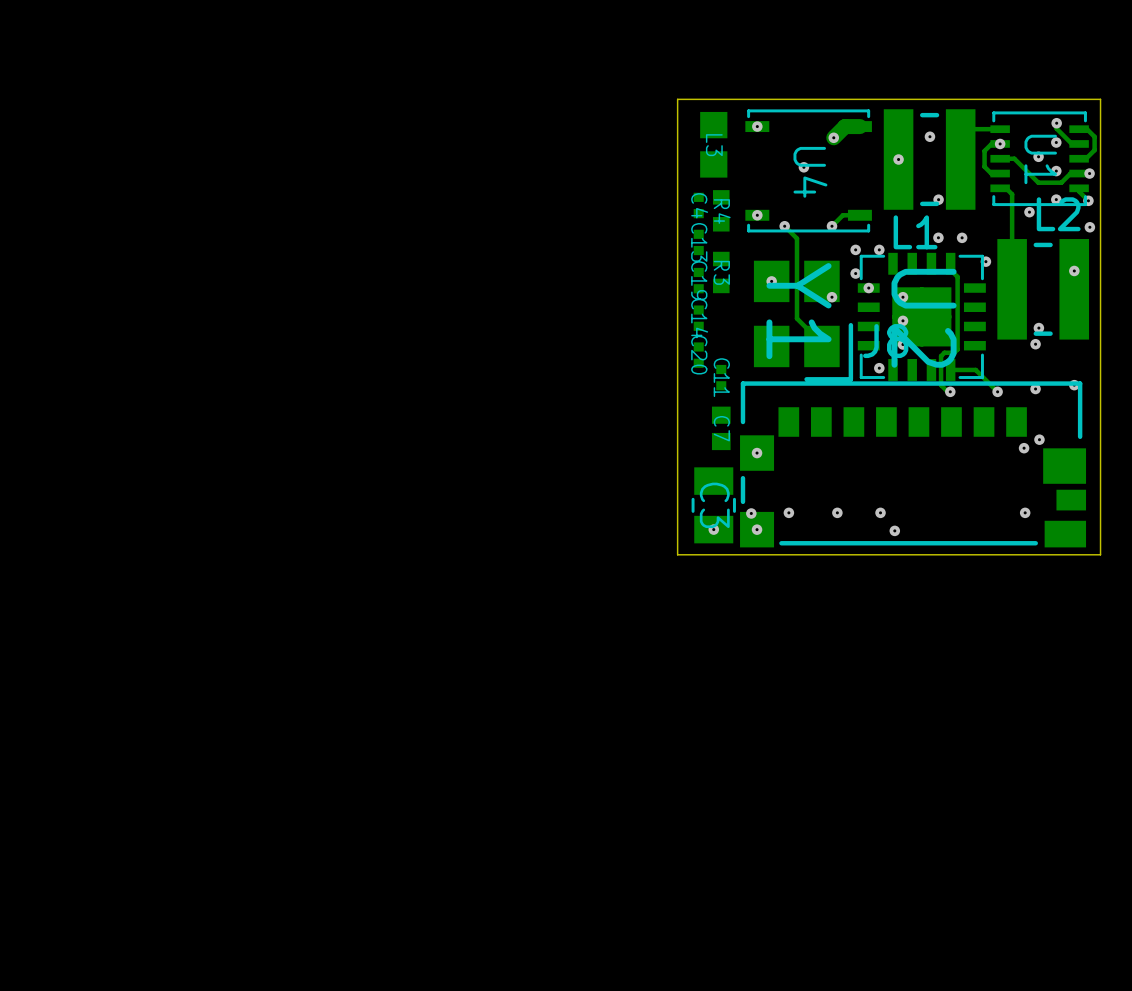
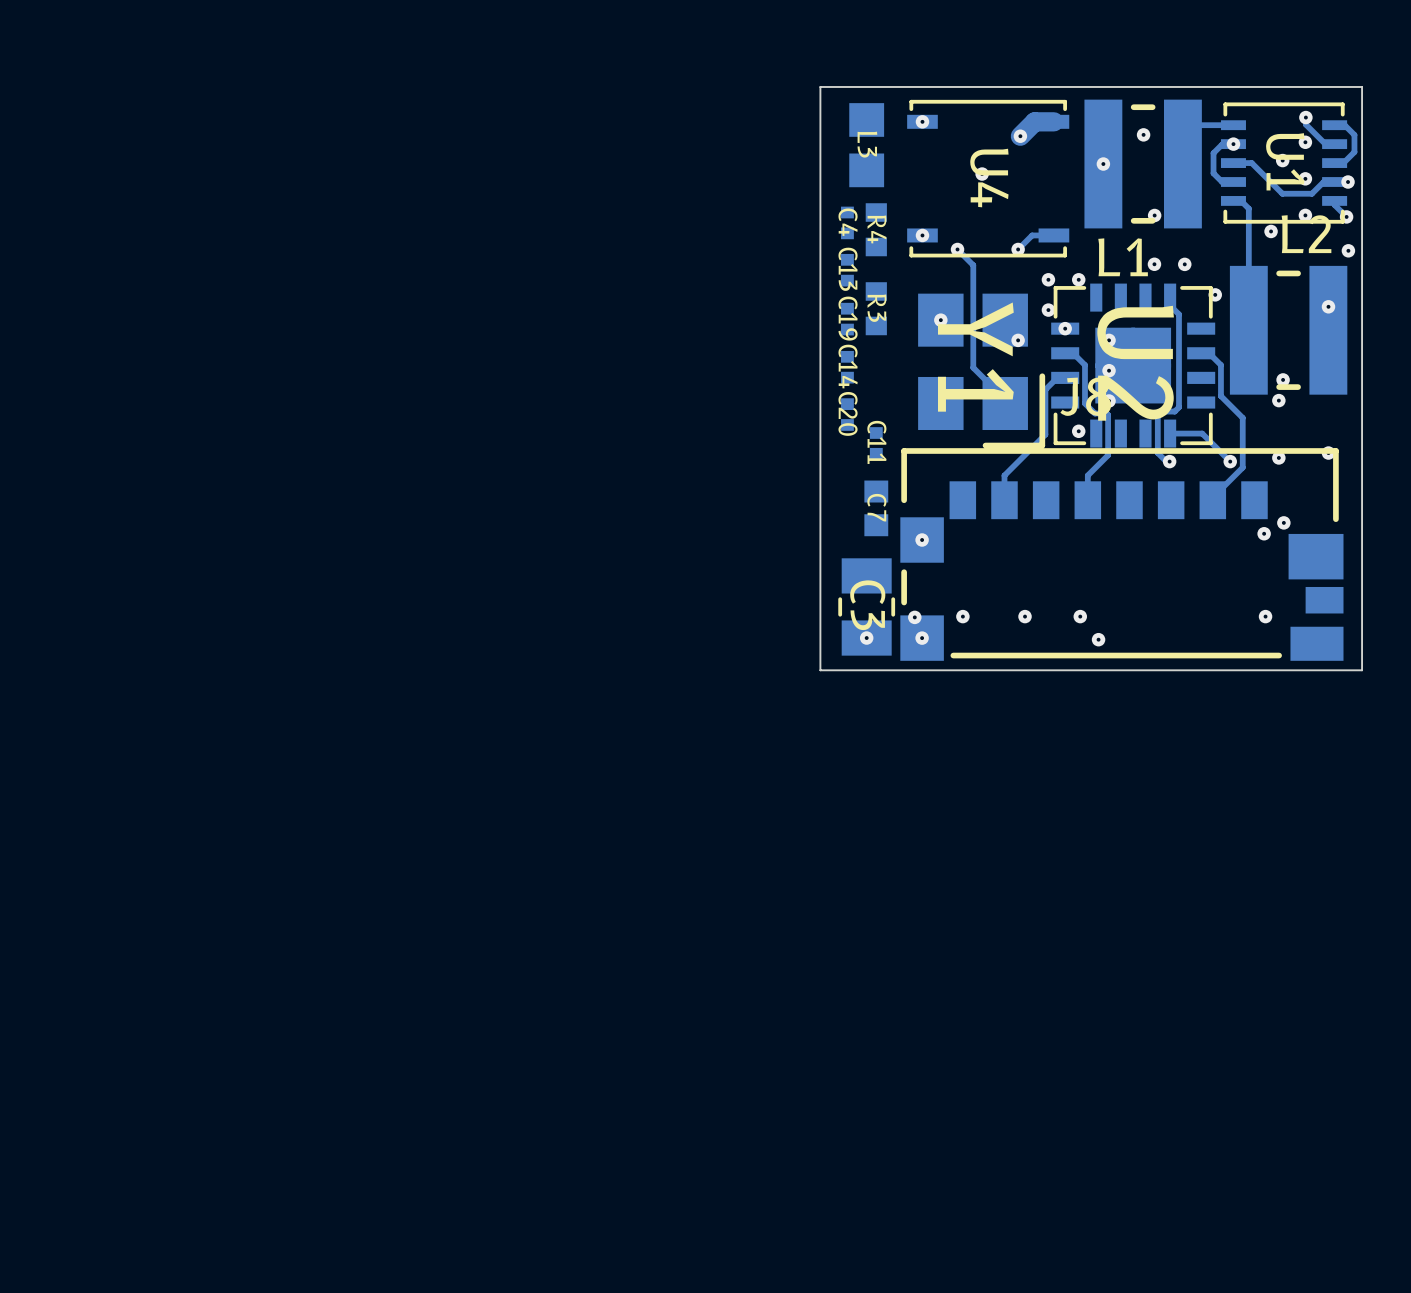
track: none -> (1065, 353) (1073, 353) (1084, 365) (1084, 403) (1094, 413) (1108, 414) (1108, 455) (1087, 475) (1087, 500)
track: none -> (1201, 353) (1209, 353) (1220, 365) (1220, 396) (1242, 417) (1242, 467) (1212, 497) (1212, 500)
track: none -> (1065, 377) (1057, 377) (1045, 389) (1045, 434) (1004, 475) (1004, 500)

